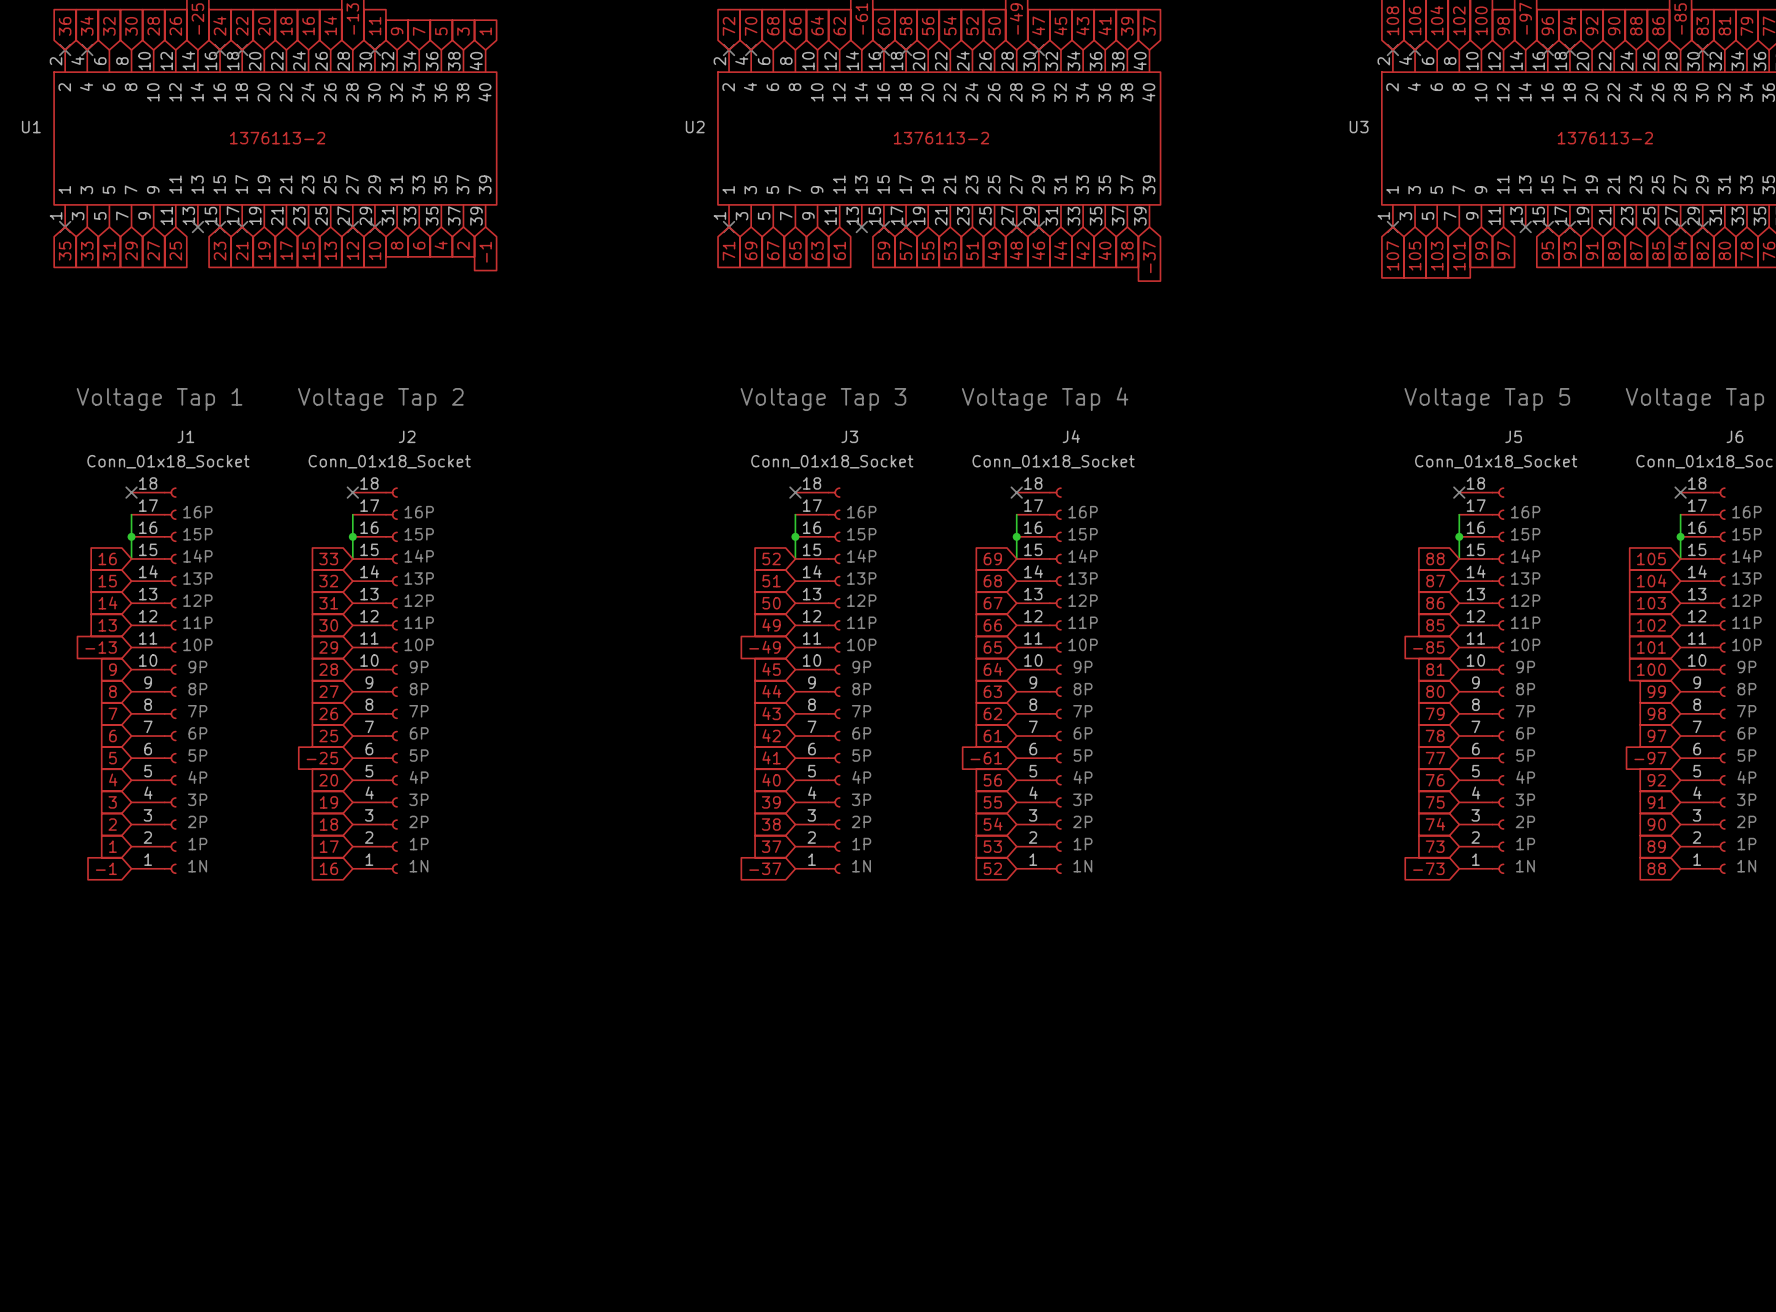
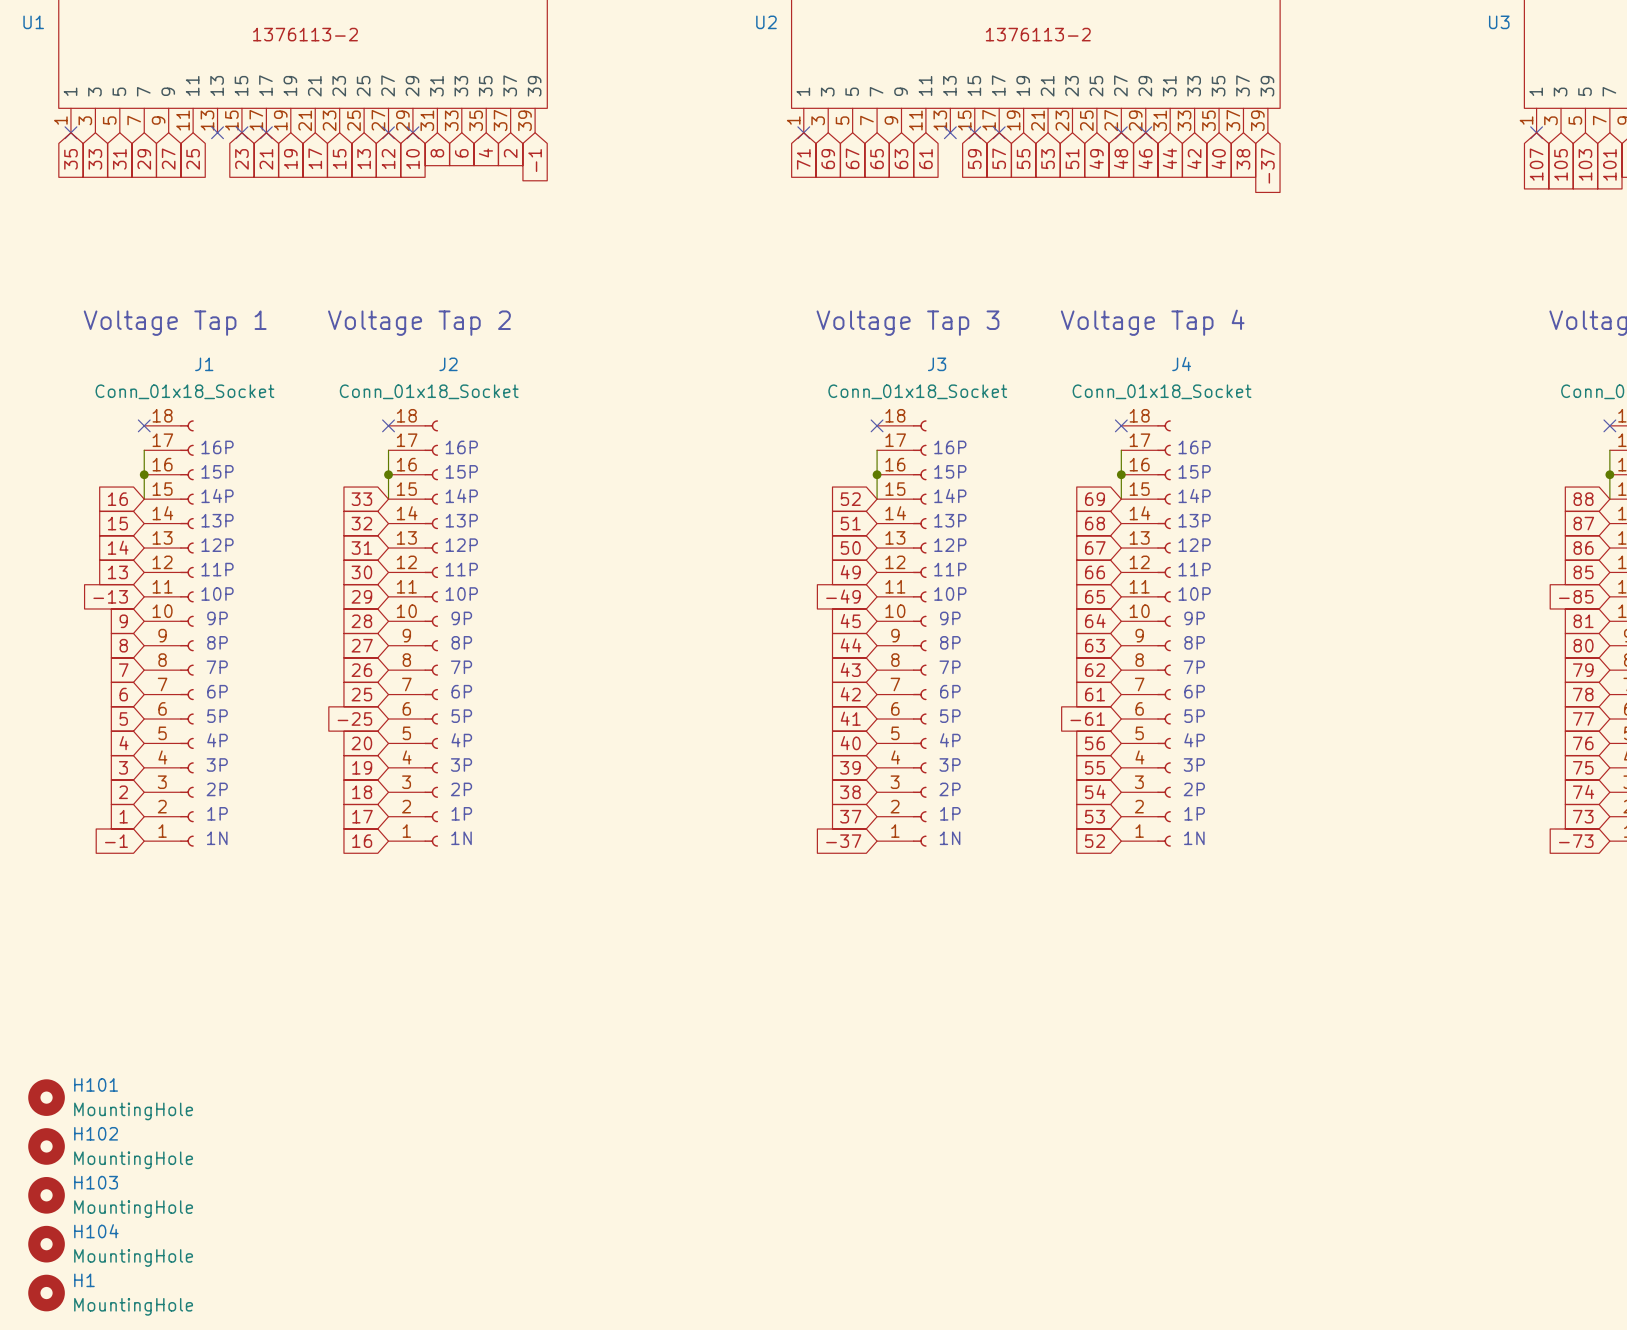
H101: none -> MountingHole (46, 1097)
H102: none -> MountingHole (46, 1146)
H103: none -> MountingHole (46, 1195)
H104: none -> MountingHole (46, 1244)
H1: none -> MountingHole (46, 1293)

